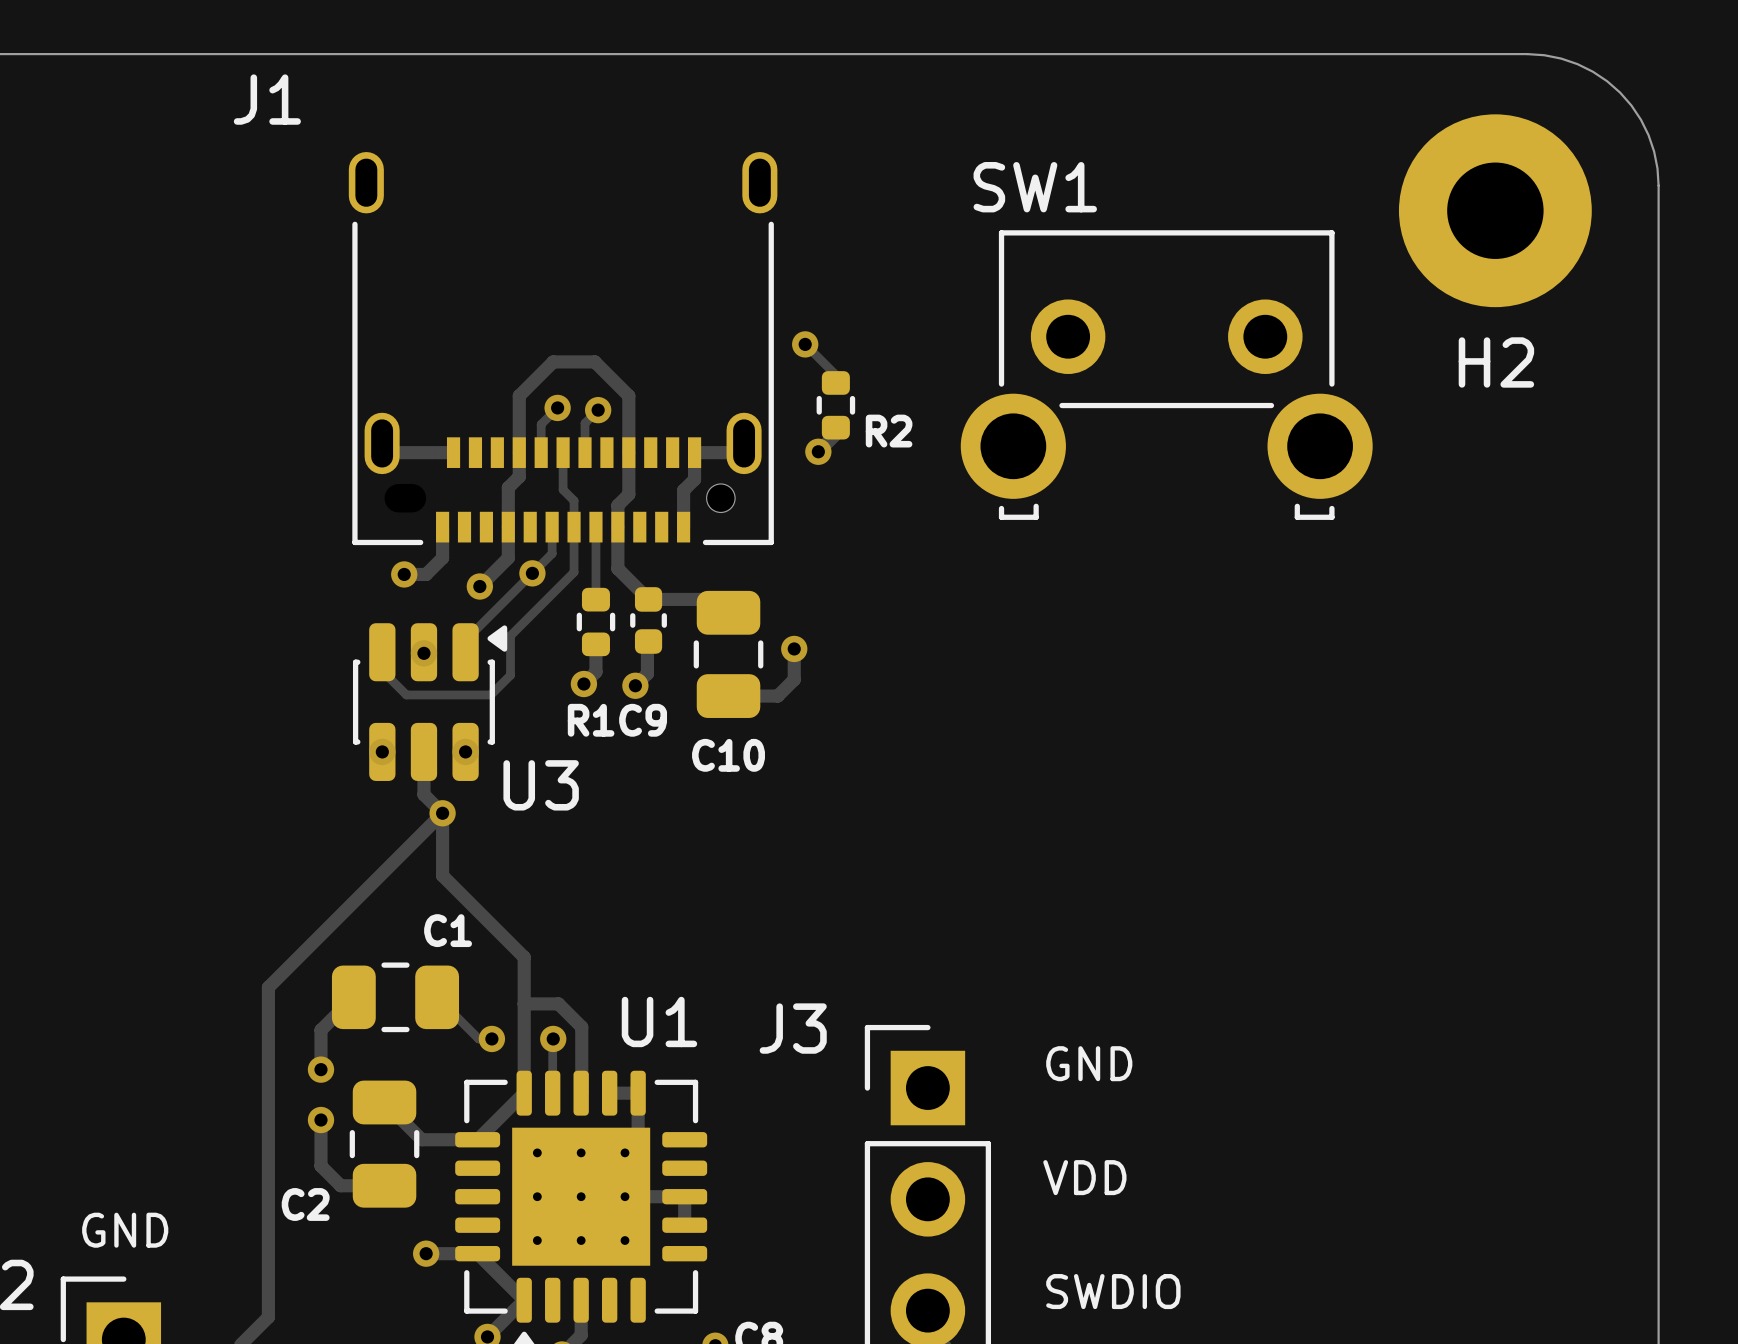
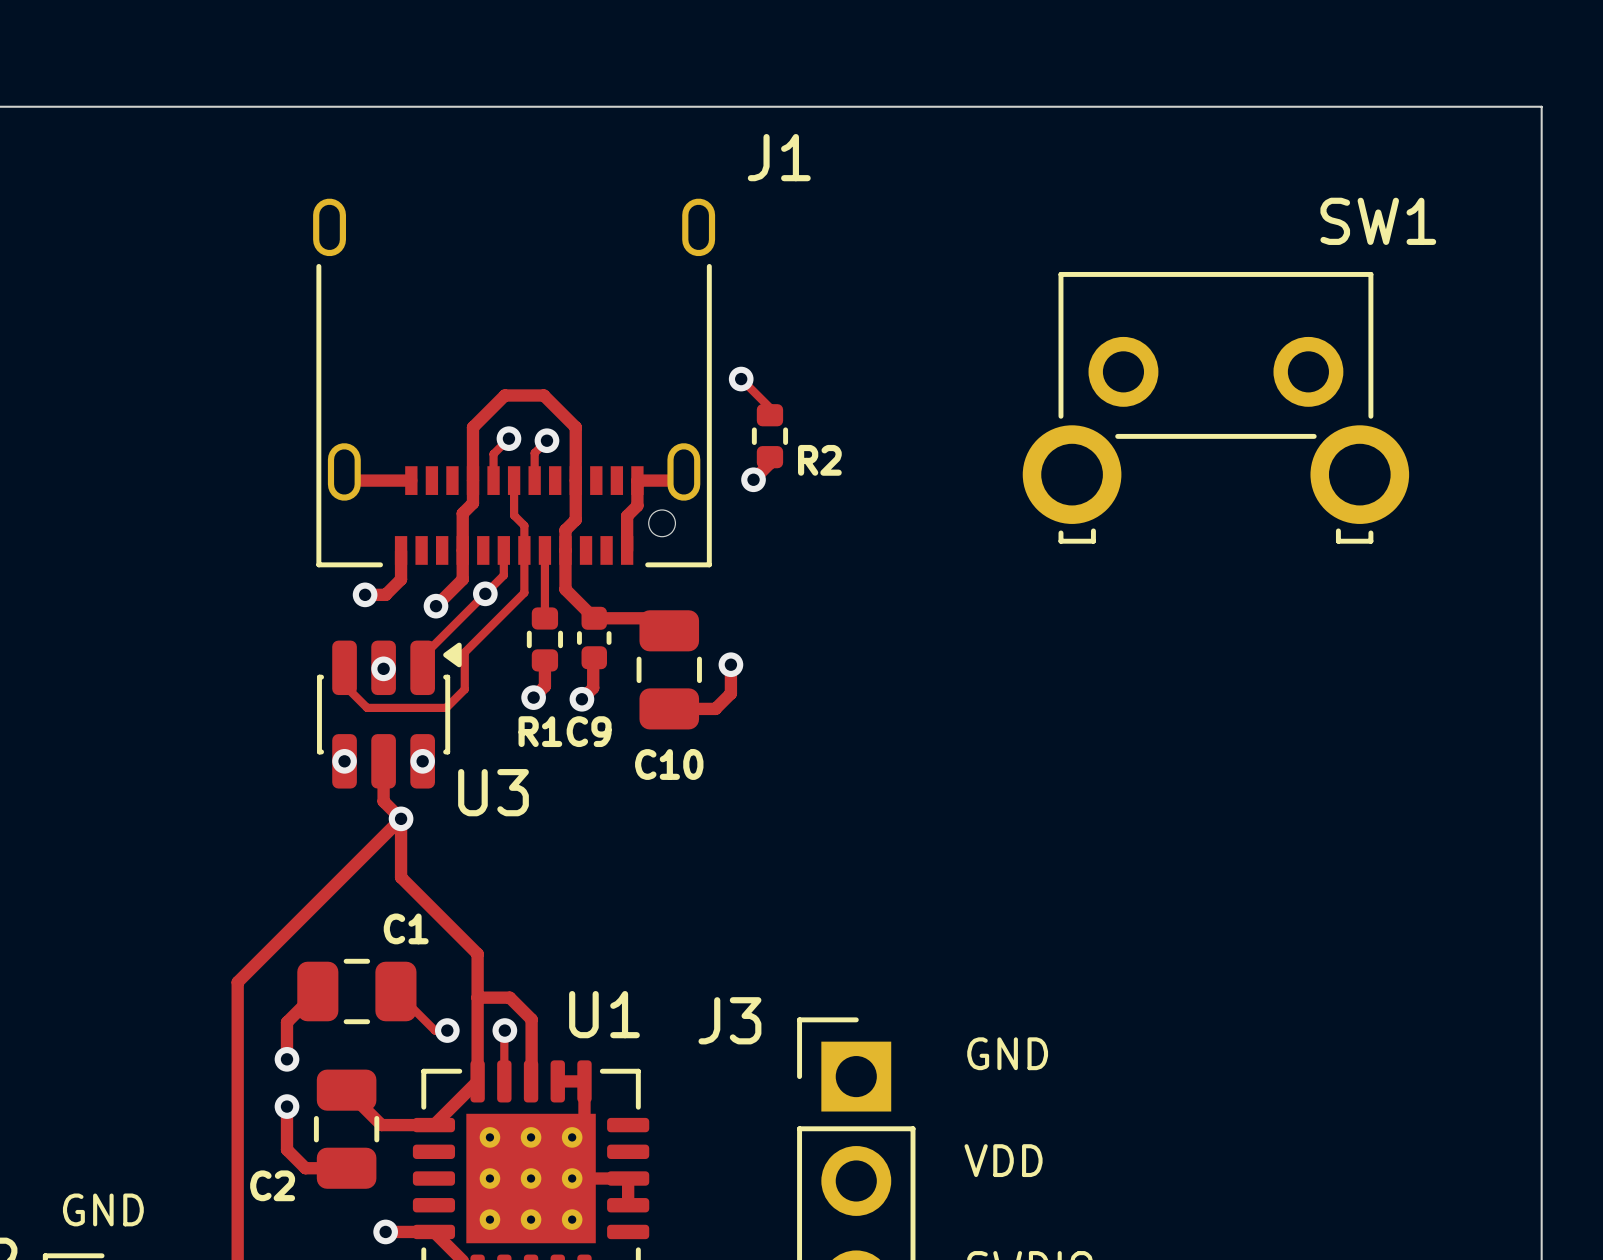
board edge: (1527, 54) (1544, 55) (1577, 64) (1607, 81) (1620, 92) (1631, 105) (1648, 135) (1657, 168) (1658, 185) -> (1418, 106) (1541, 106) (1541, 230)
J1 name position: J1 (267, 99) -> J1 (779, 157)
SW1 name position: SW1 (1035, 187) -> SW1 (1378, 221)
H2: (1495, 210) -> none
SW1 position: (1166, 375) -> (1215, 407)

